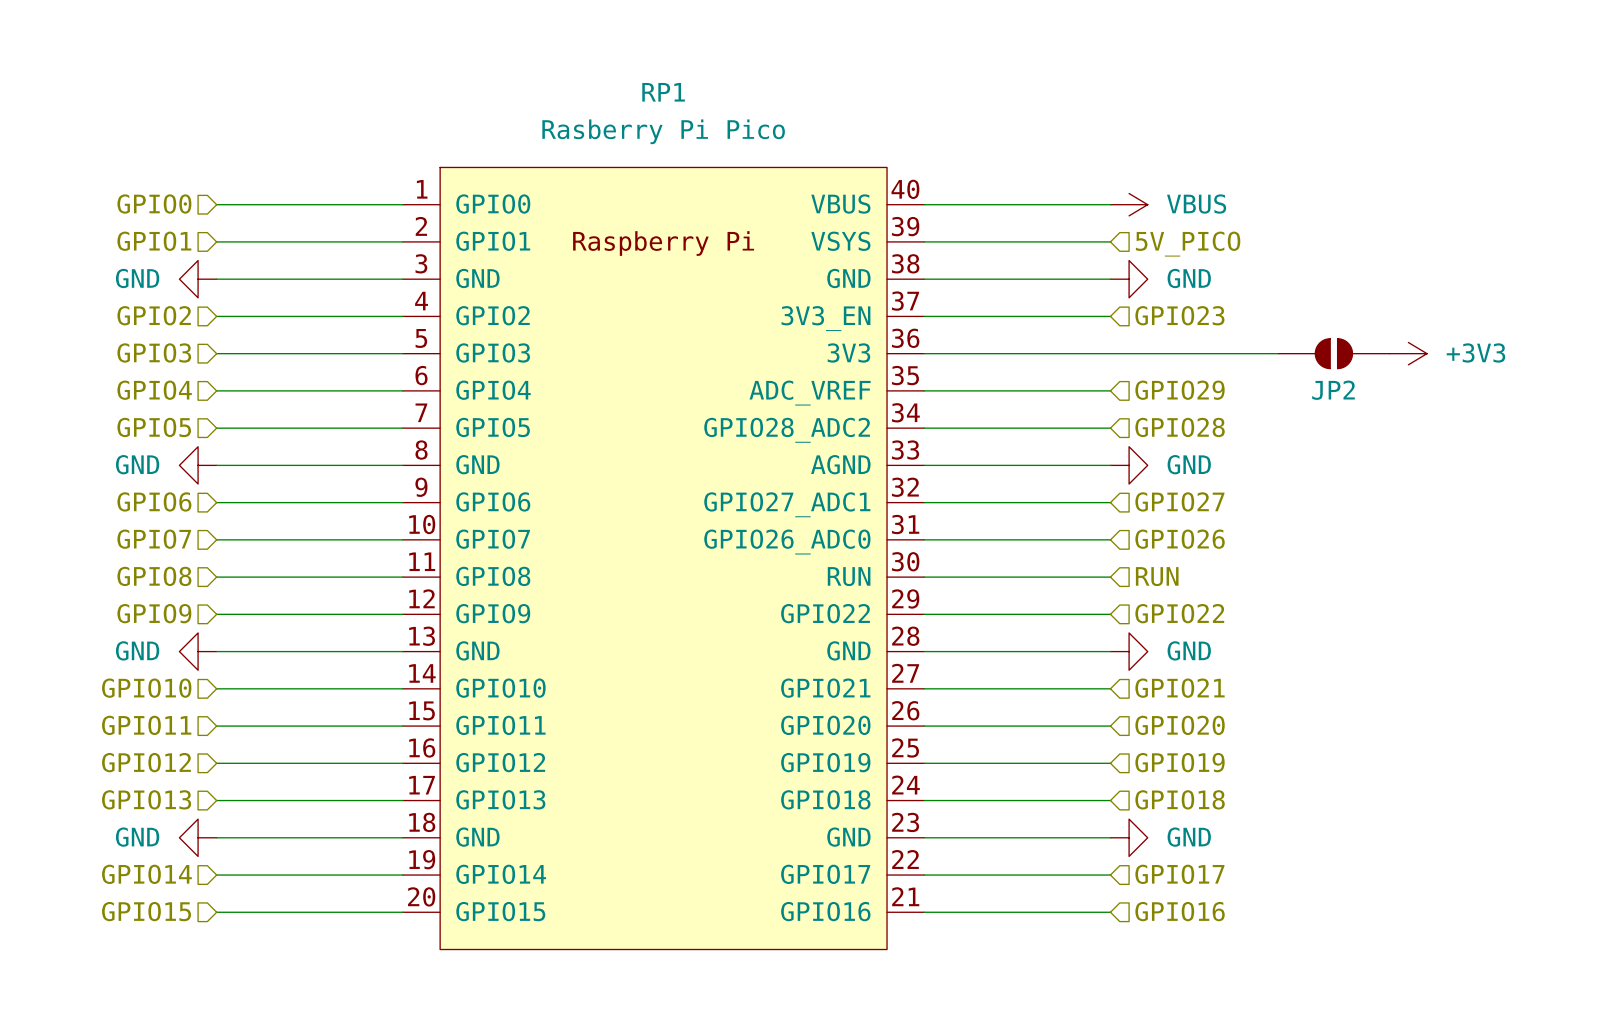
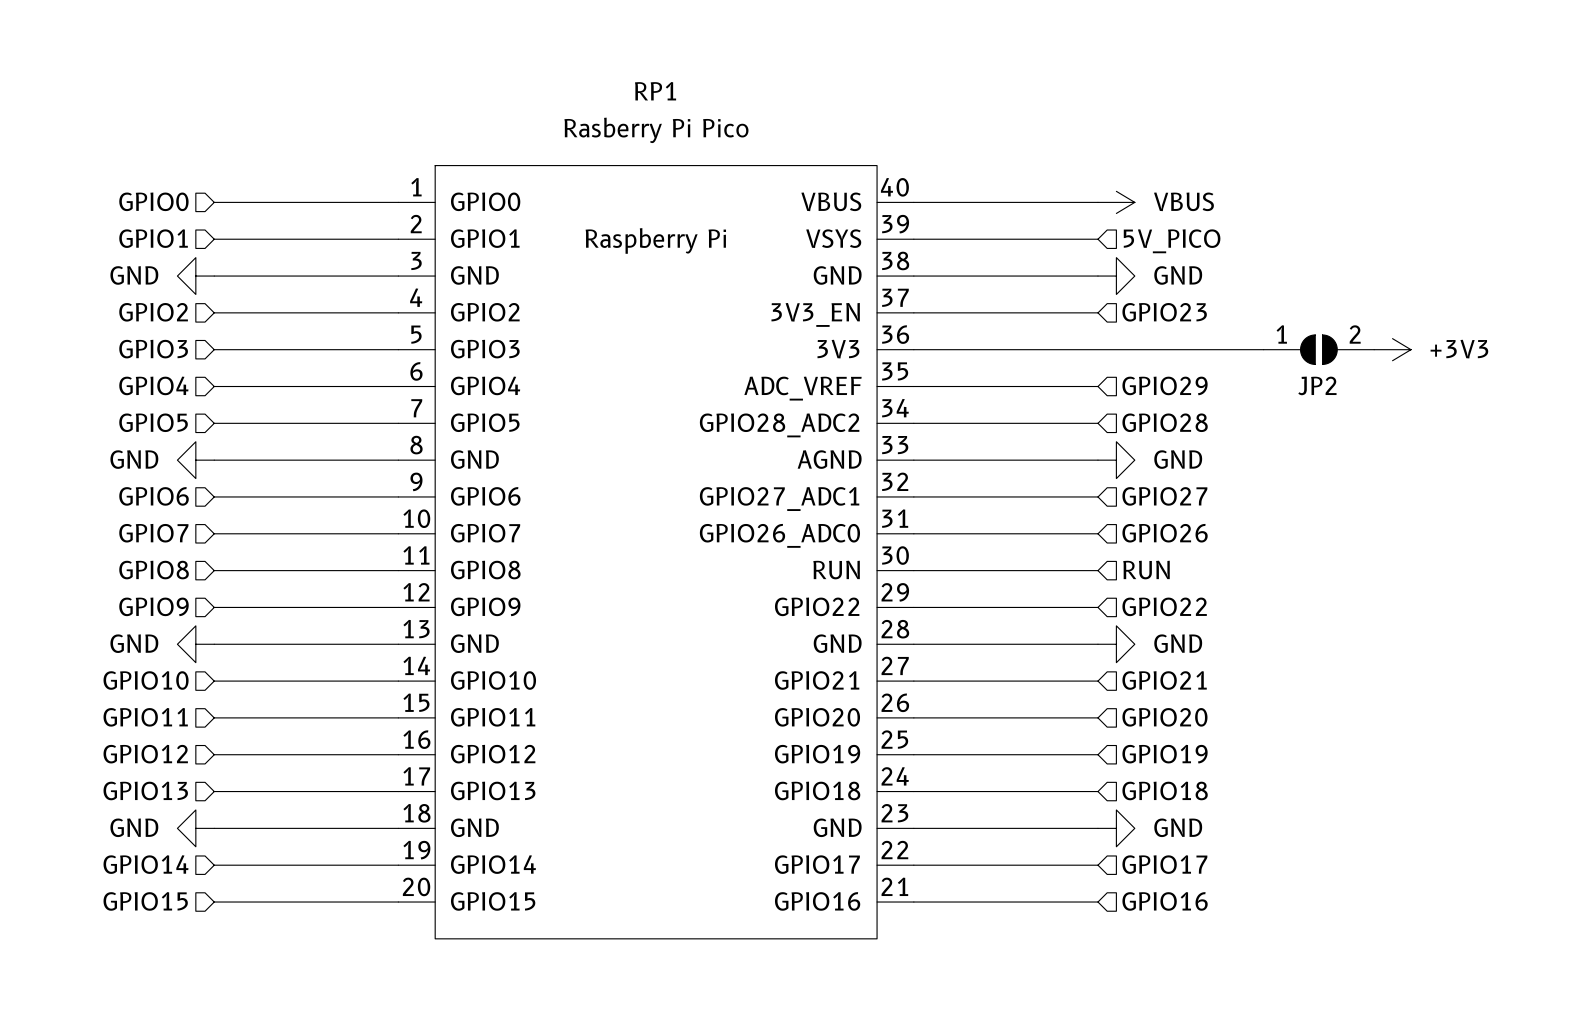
JP2 pin number: none -> 1 (1281, 334)
JP2 pin number: none -> 2 (1355, 334)

